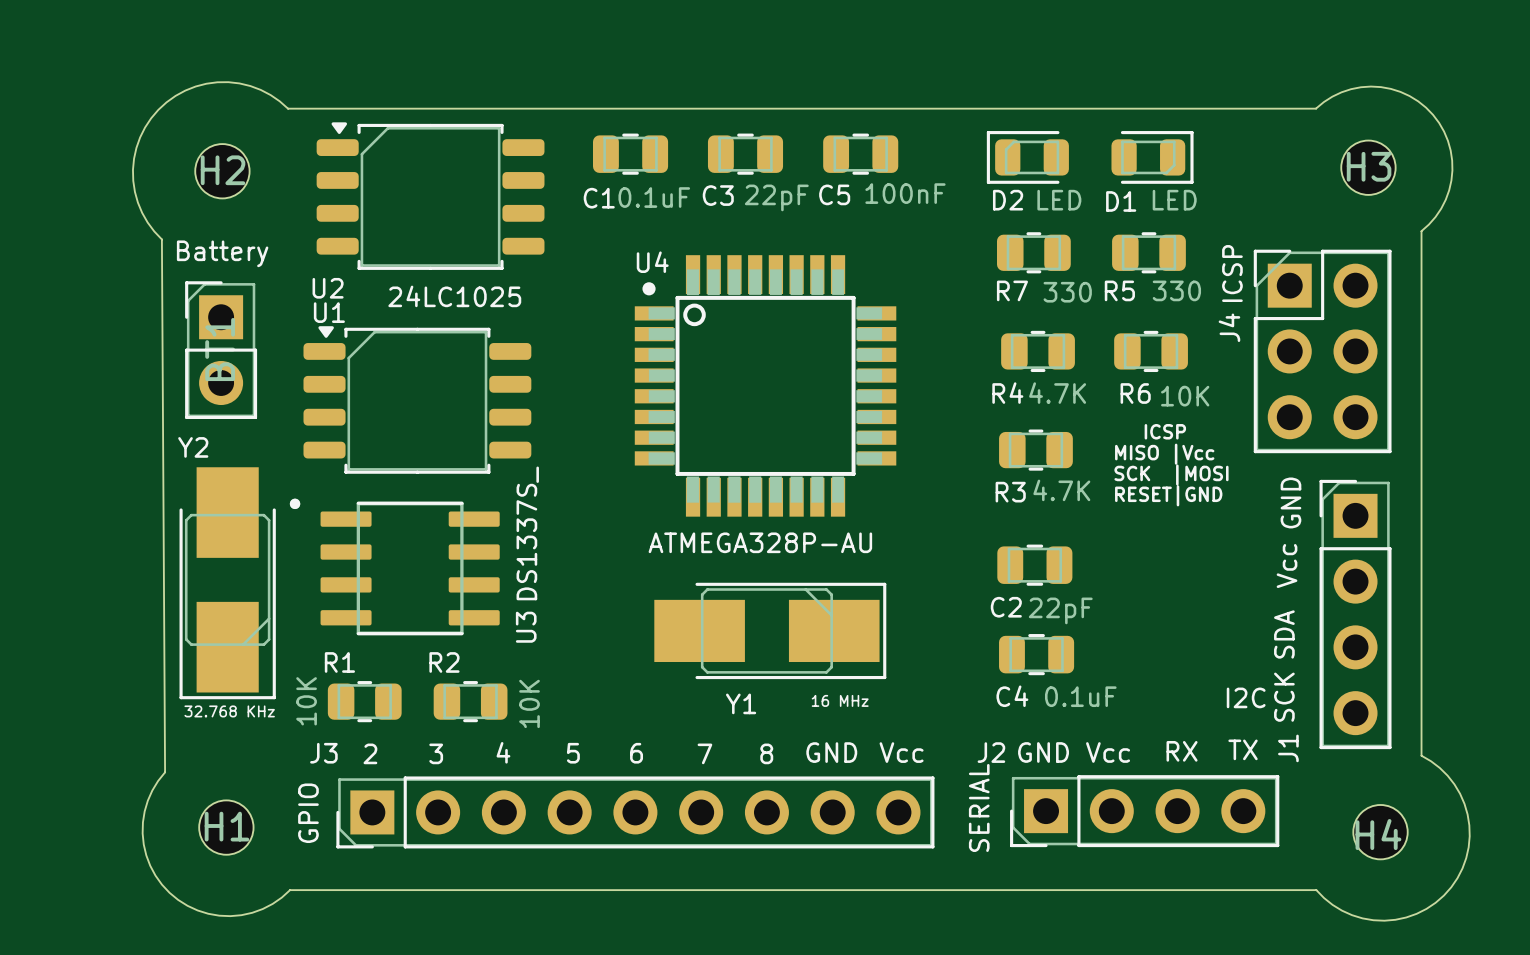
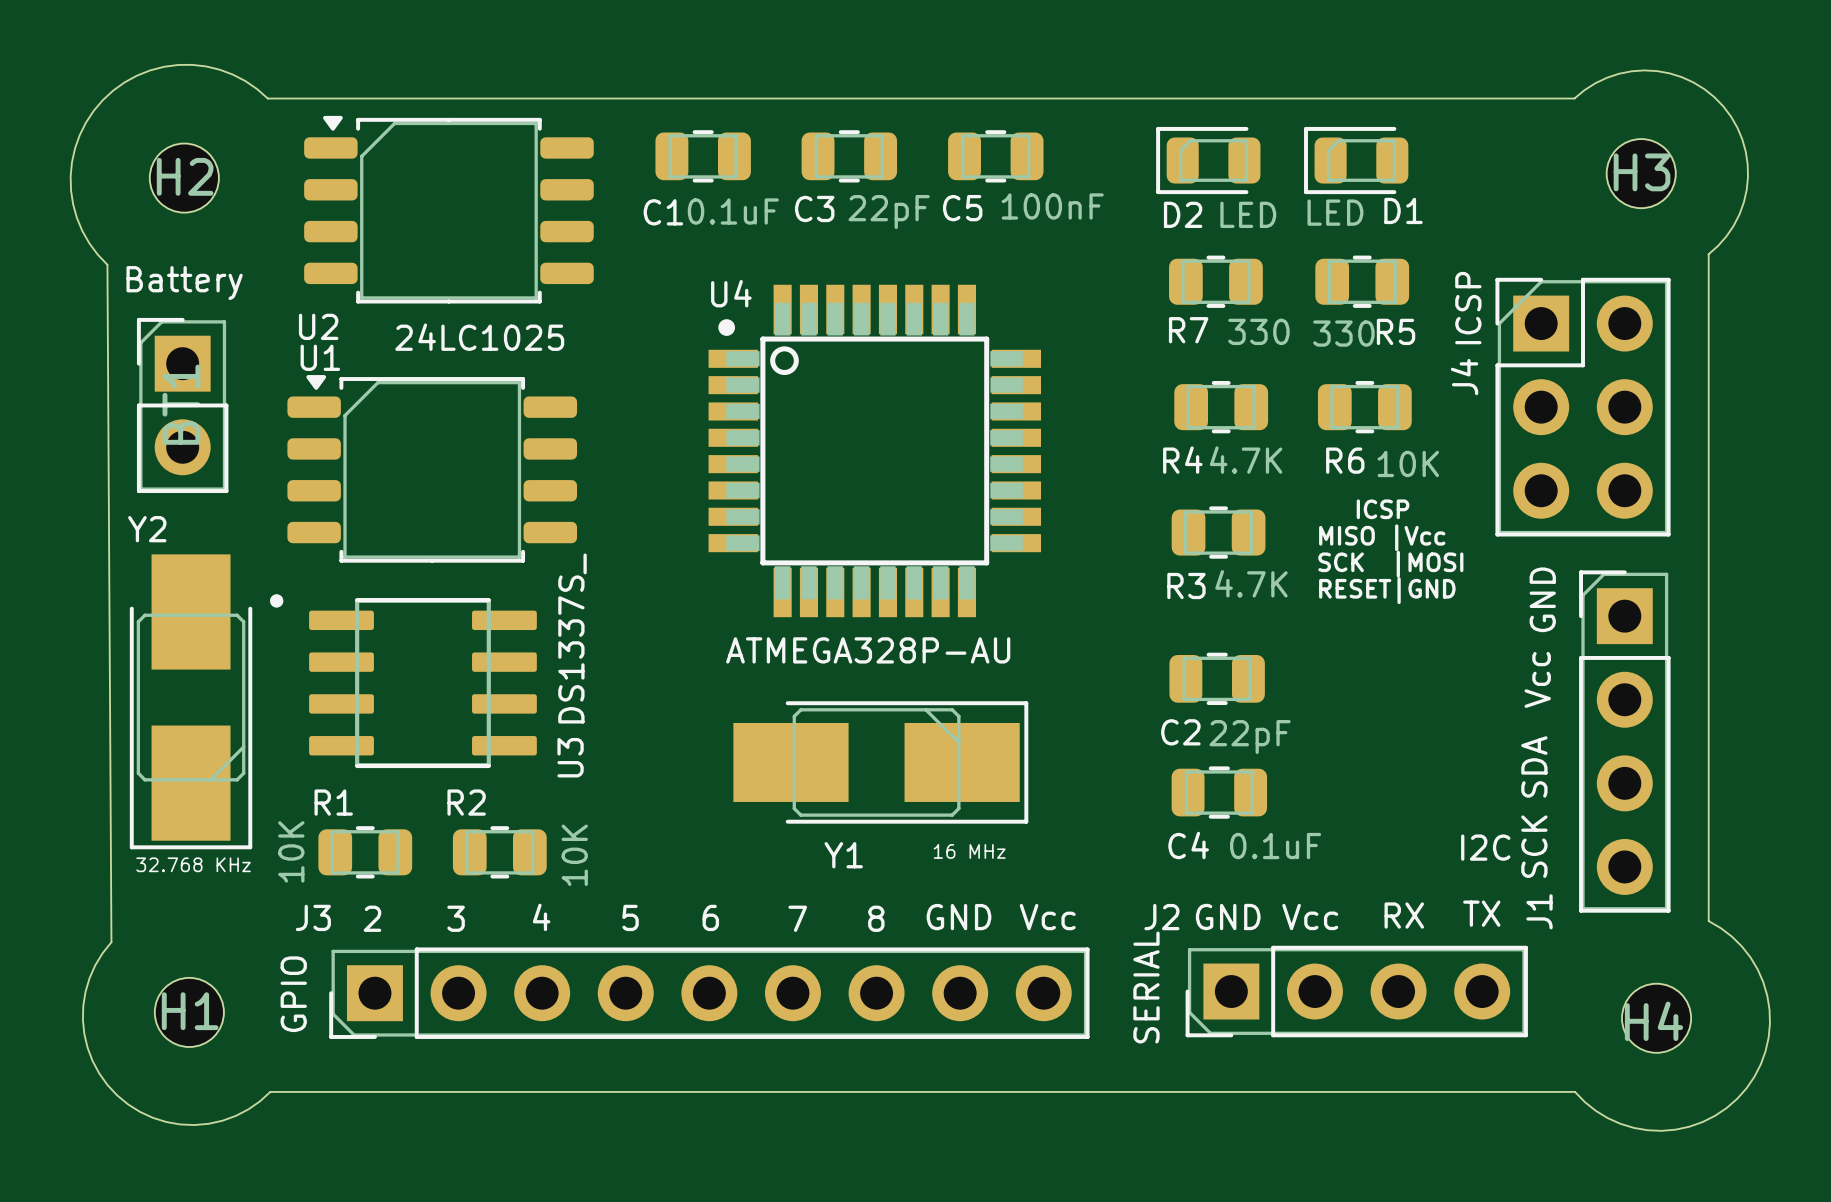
D1 rotation: 0° (1152, 157) -> 180° (1356, 160)
D1 name position: D1 (1121, 201) -> D1 (1403, 210)
R5 name position: R5 (1119, 290) -> R5 (1396, 331)
R5 value position: 330 (1176, 290) -> 330 (1343, 333)

